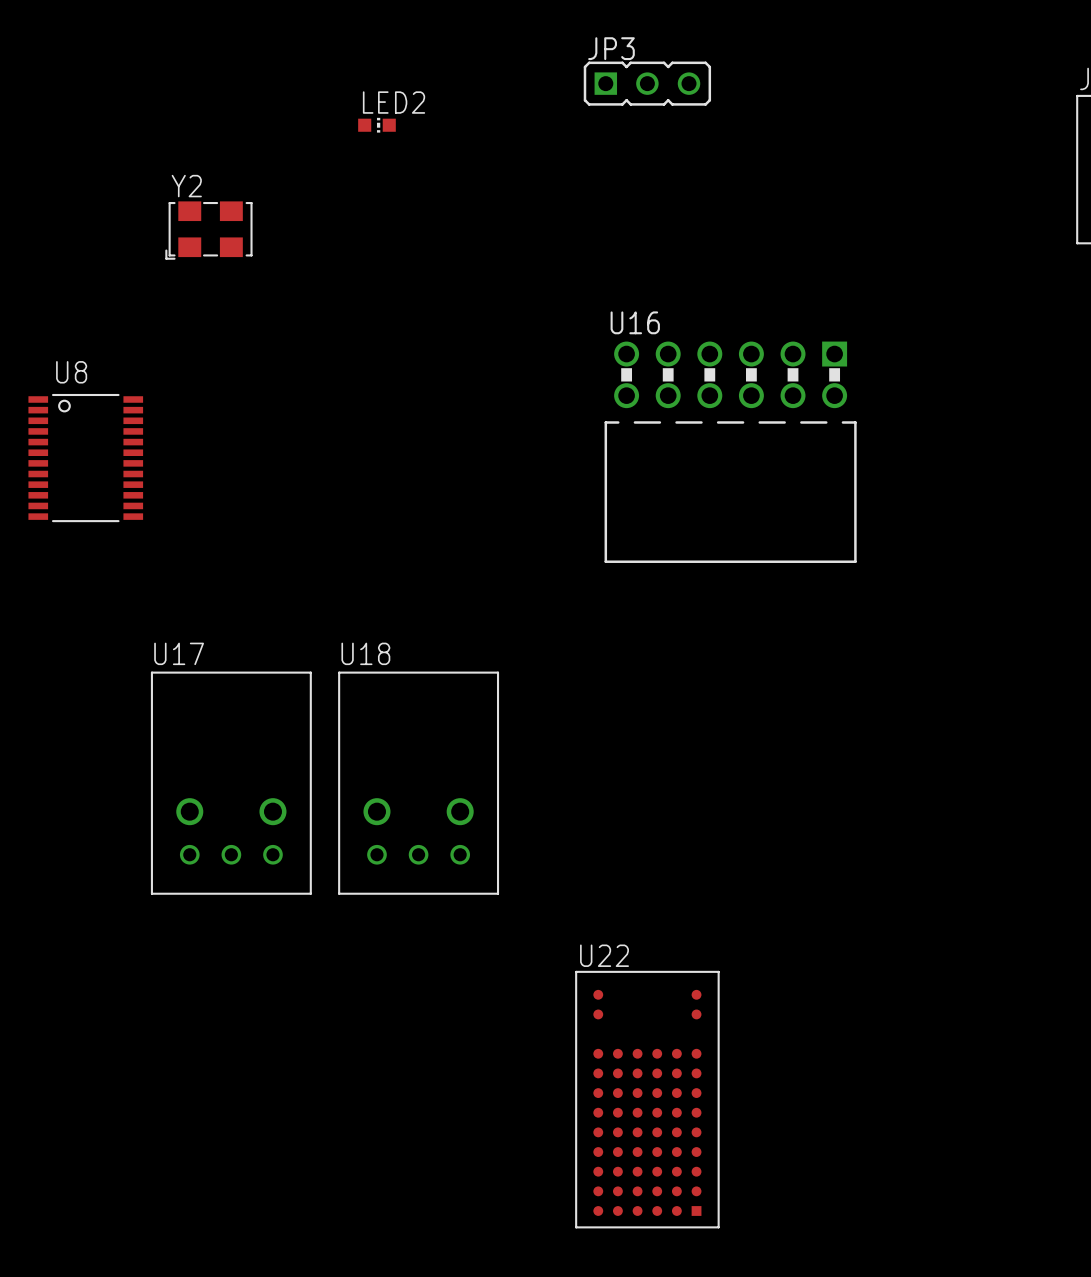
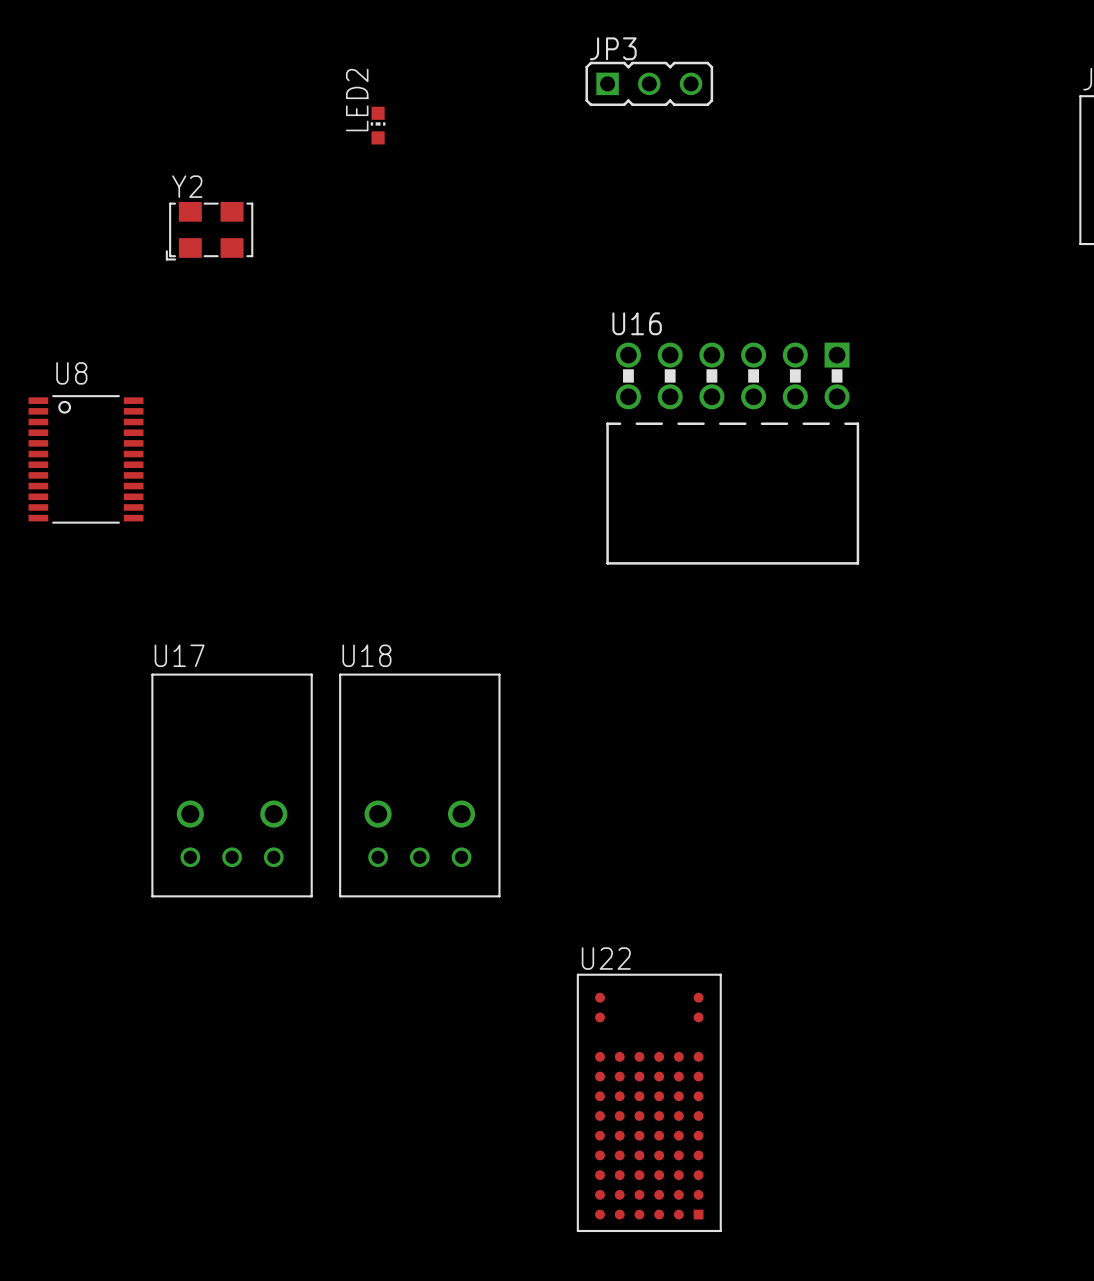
LED2 rotation: 0° (376, 125) -> 90° counterclockwise (378, 125)

